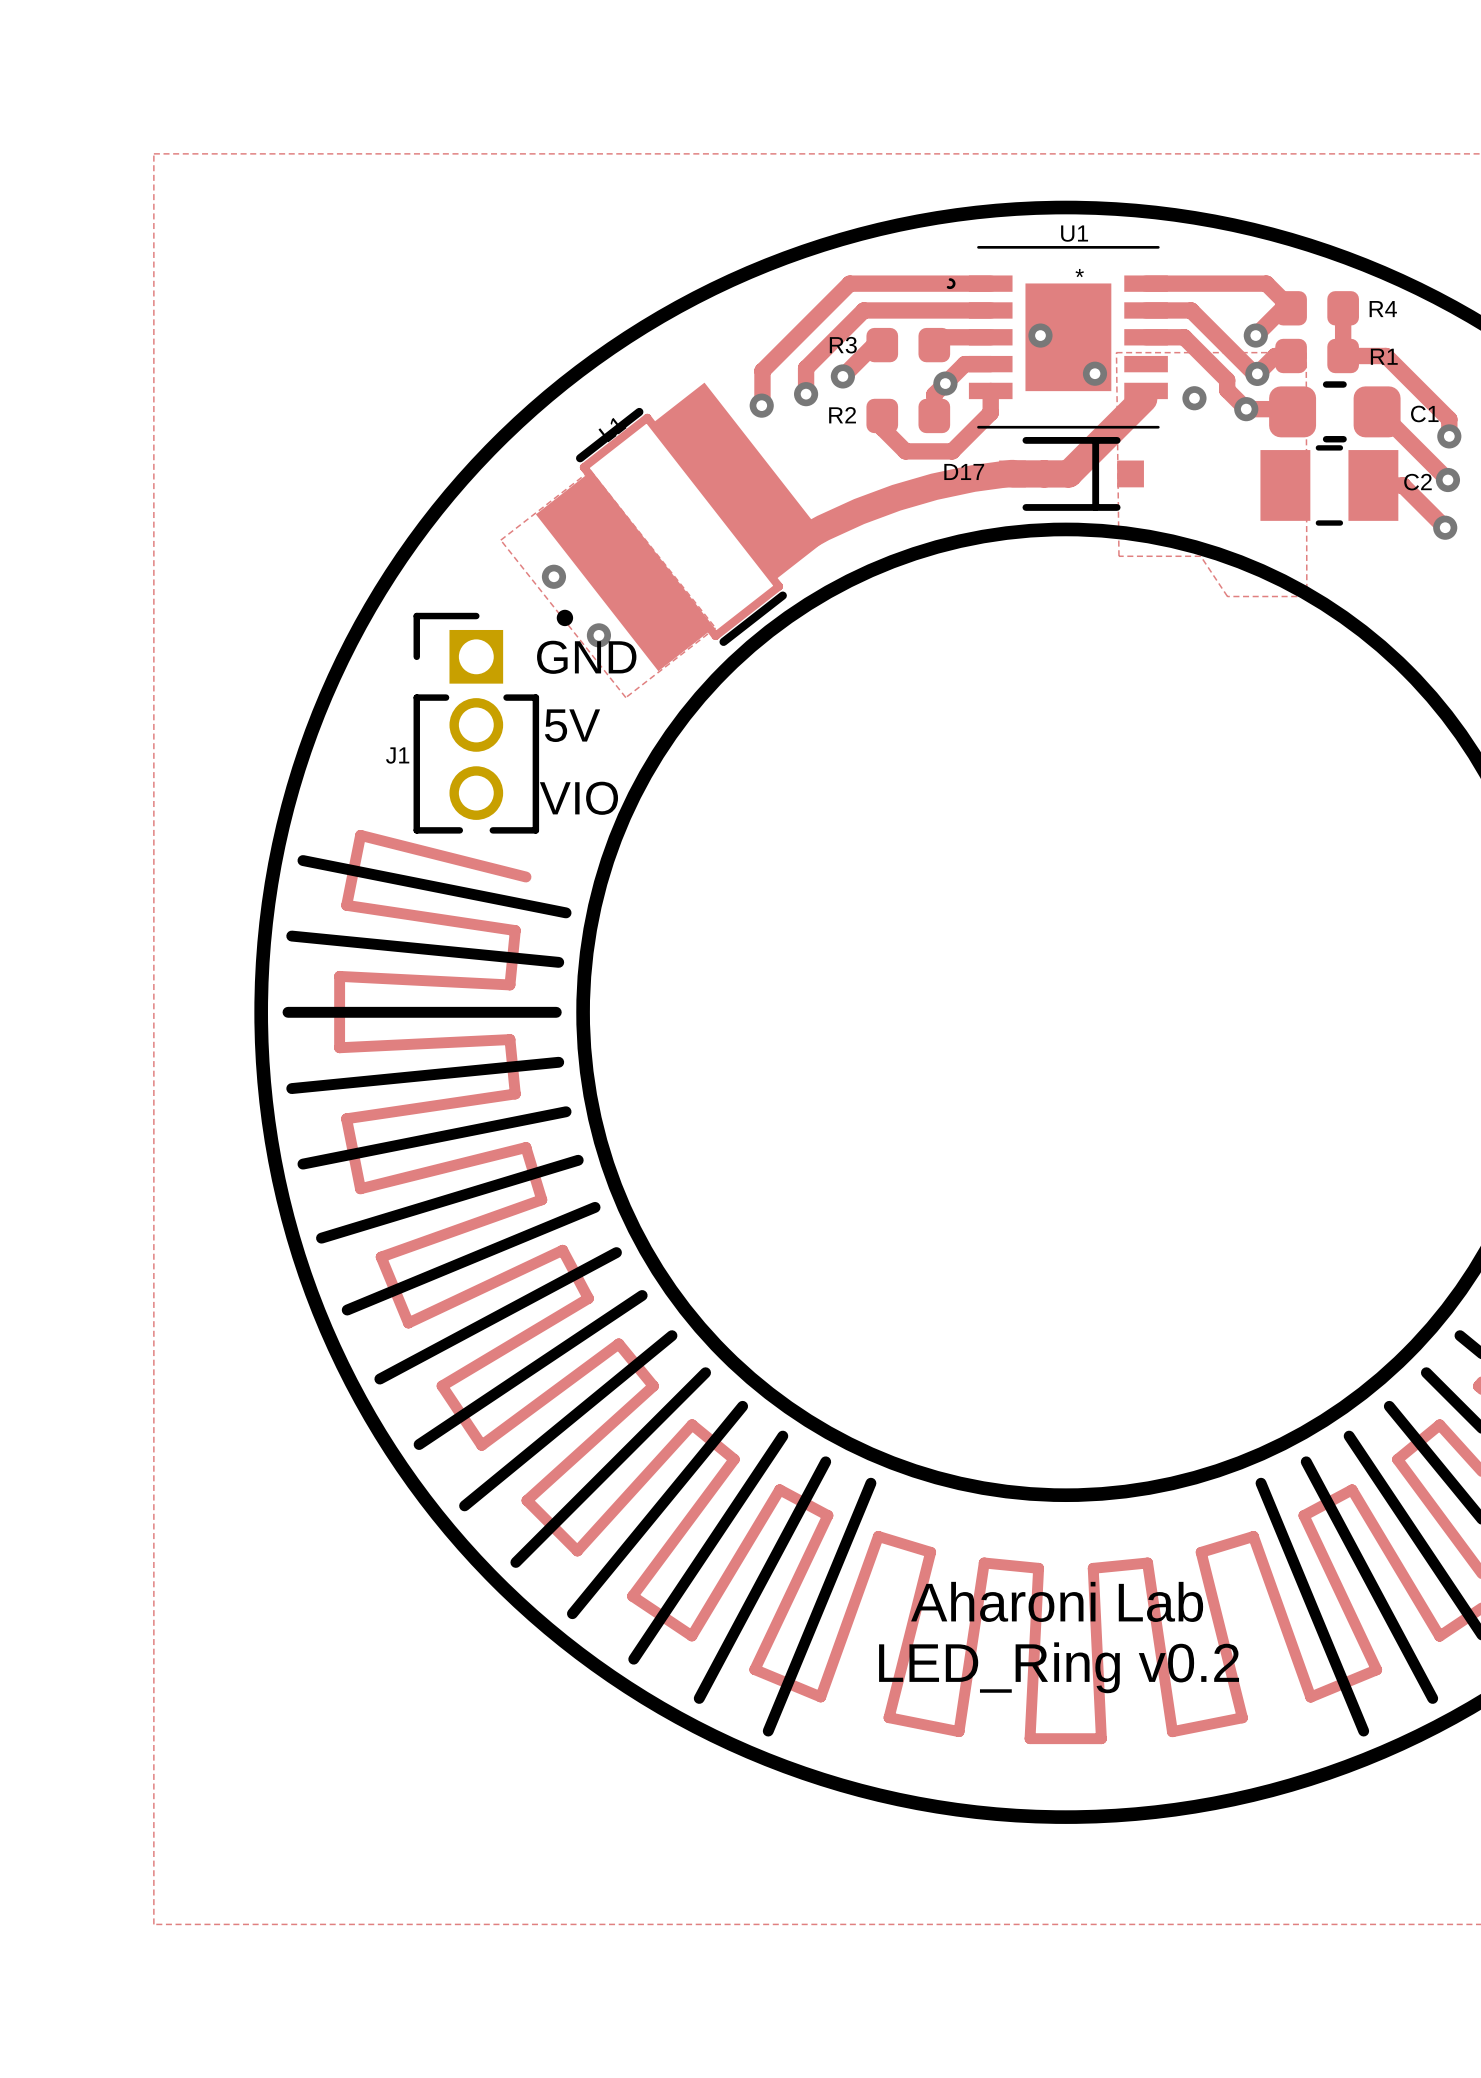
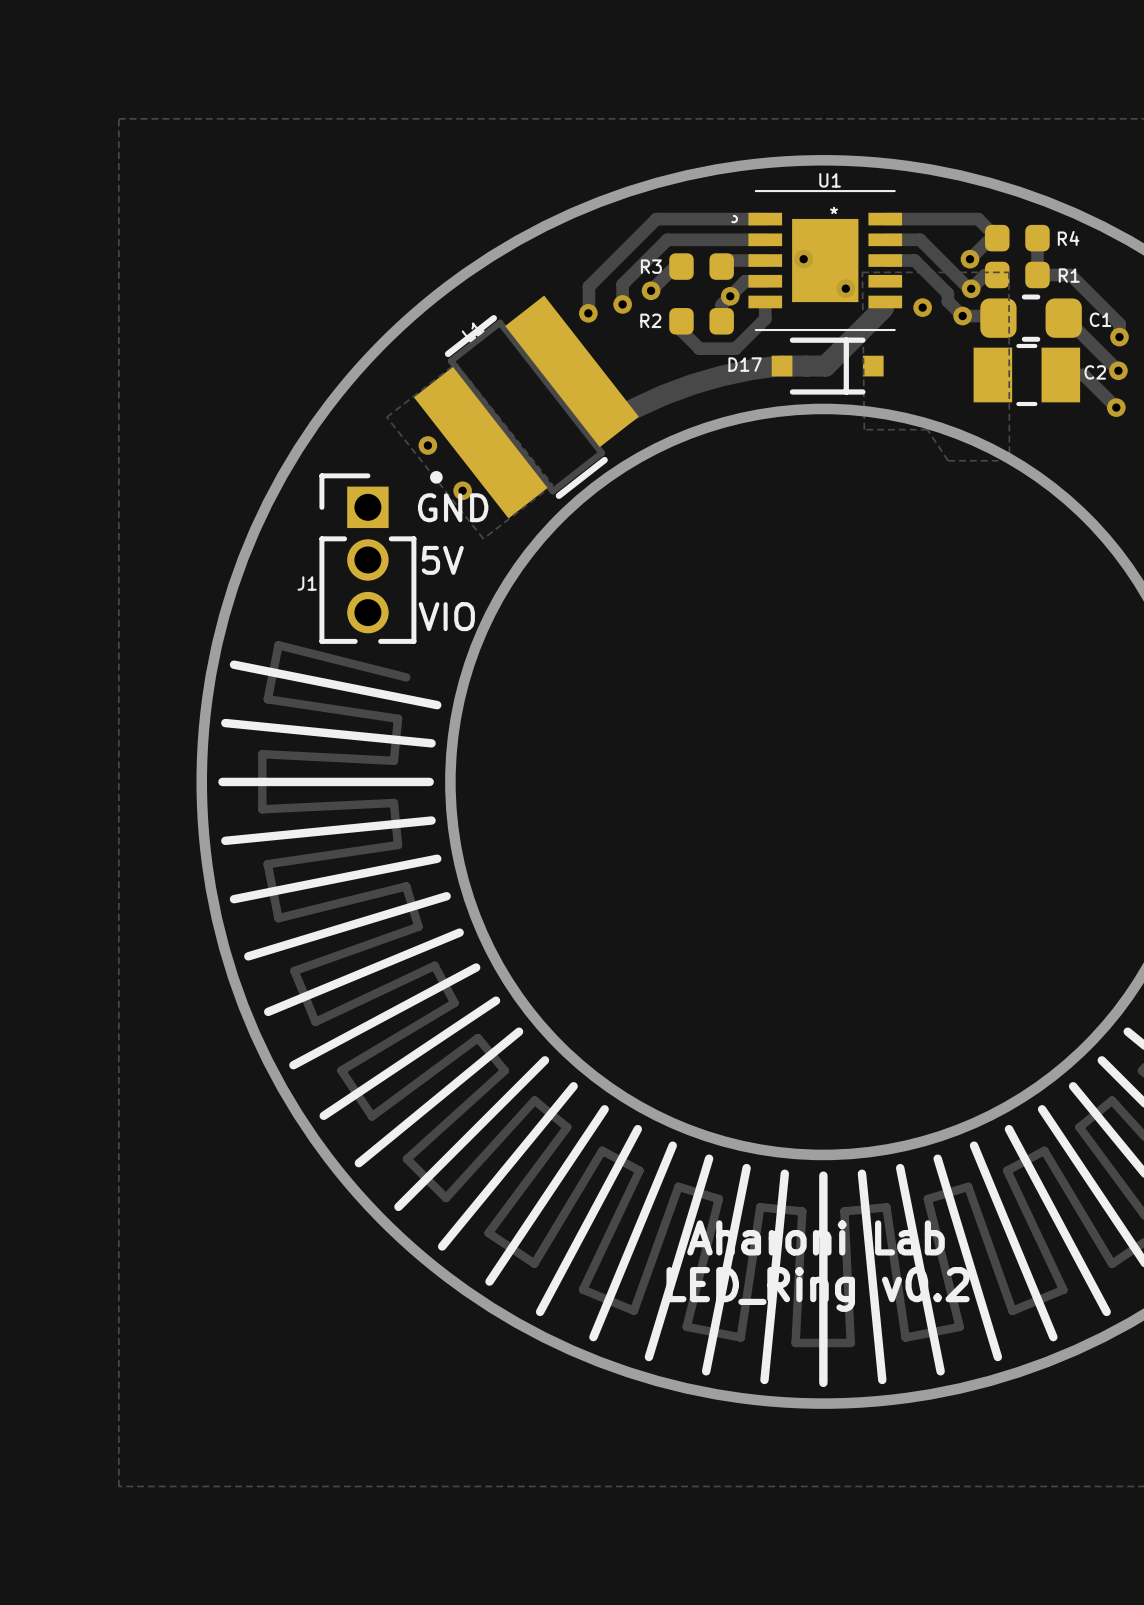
line: none -> (709, 1158) (648, 1356)
line: none -> (937, 1158) (997, 1356)
line: none -> (746, 1168) (706, 1371)
line: none -> (900, 1168) (940, 1371)
line: none -> (784, 1173) (764, 1379)
line: none -> (861, 1173) (882, 1379)
line: none -> (823, 1175) (823, 1382)

